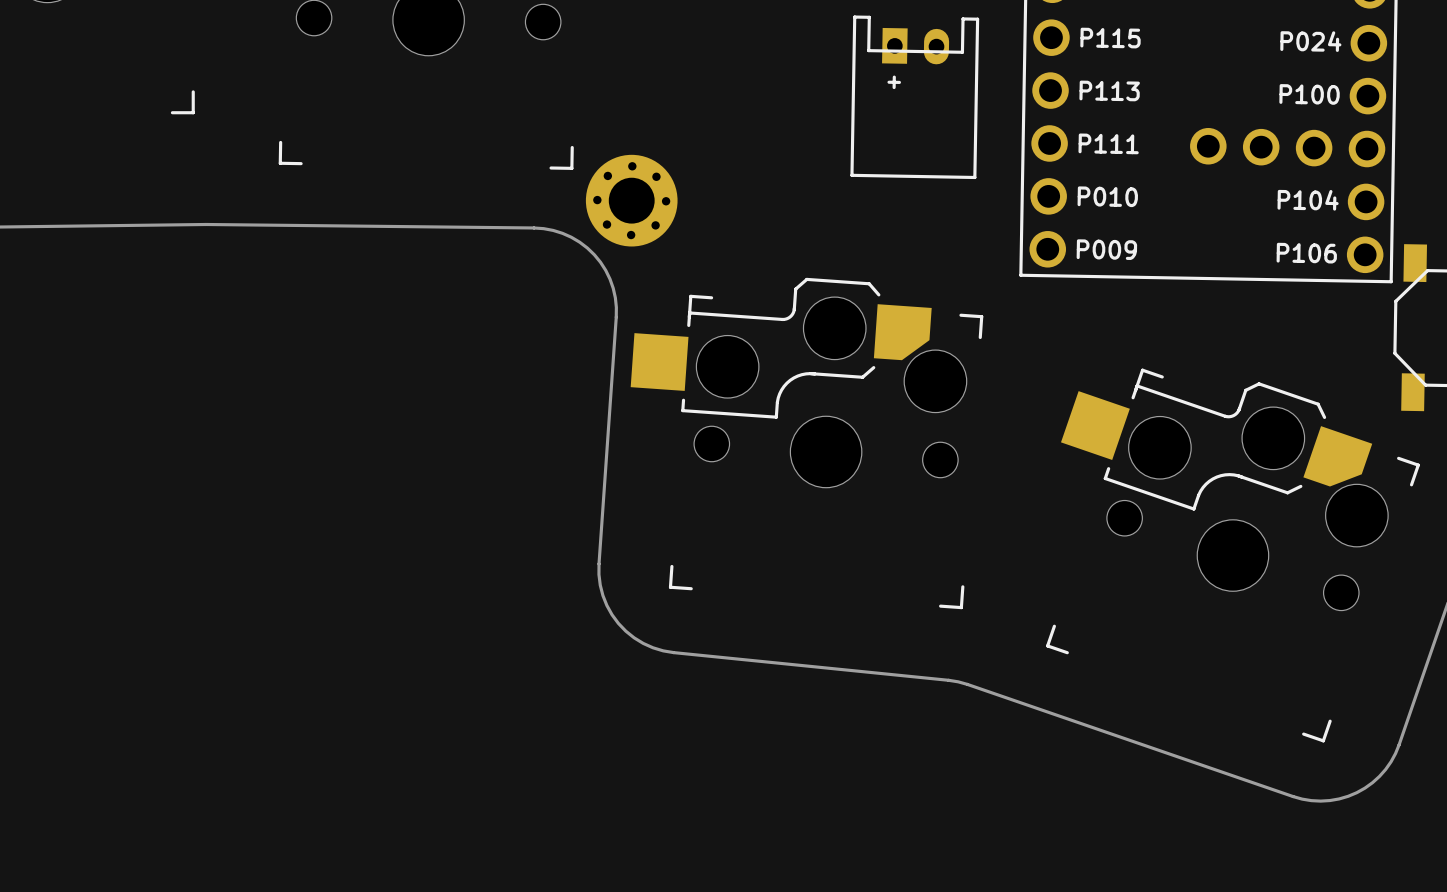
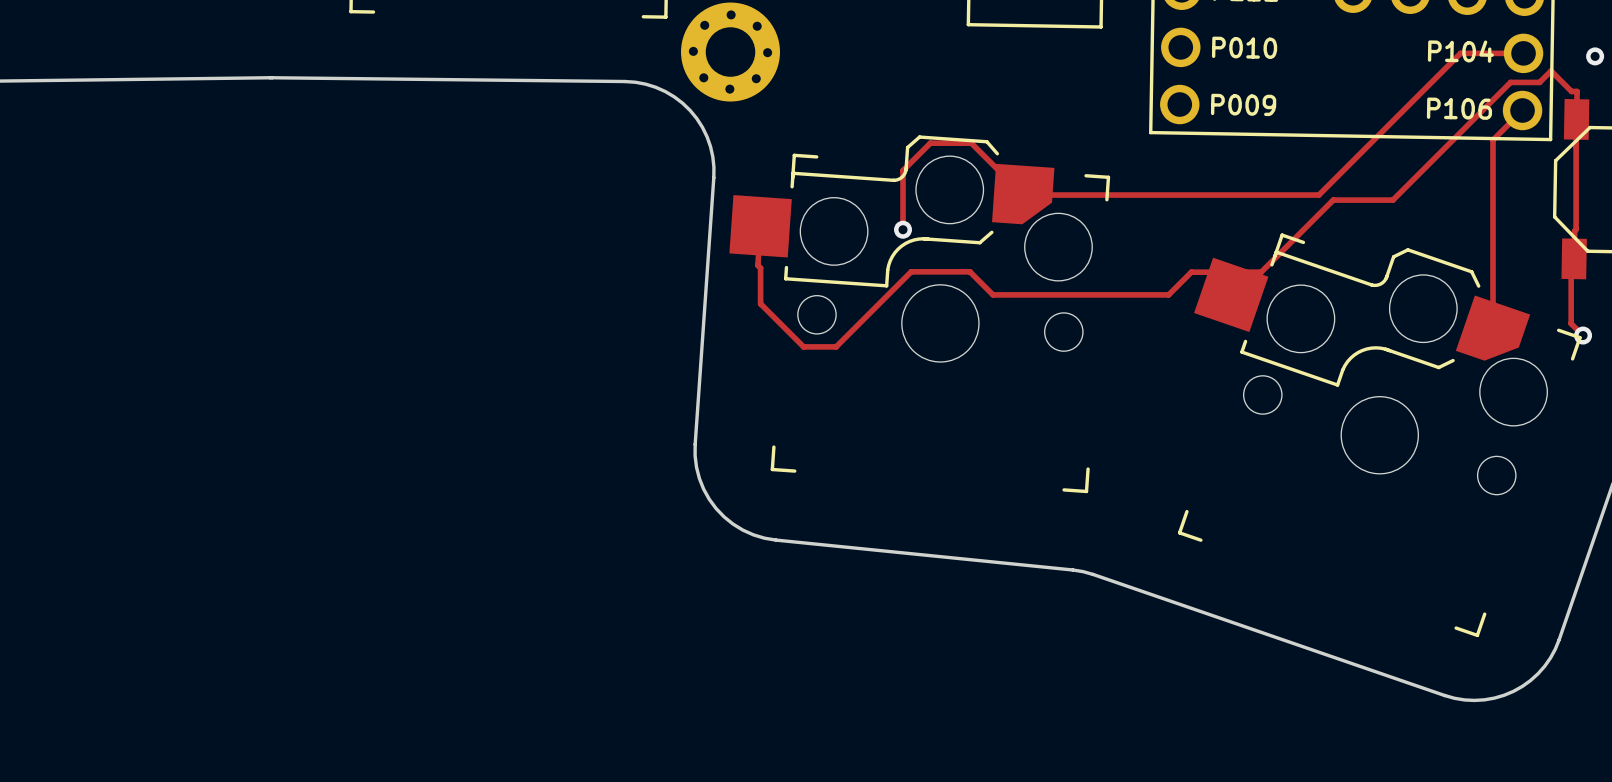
track: none -> (1523, 53) (1460, 53) (1318, 195) (1023, 195) (971, 143) (930, 143) (903, 170) (903, 229)
via: none -> (1595, 56)
track: none -> (1522, 110) (1493, 140) (1493, 332)
track: none -> (760, 226) (757, 265) (760, 268) (760, 303) (803, 346) (836, 346) (911, 271) (969, 271) (992, 294) (1168, 294) (1191, 272) (1261, 272) (1333, 200) (1392, 200) (1510, 82) (1539, 82) (1551, 70) (1571, 91) (1577, 91) (1574, 258)
via: none -> (903, 229)
track: none -> (1571, 267) (1571, 323) (1584, 336)
via: none -> (1583, 335)

